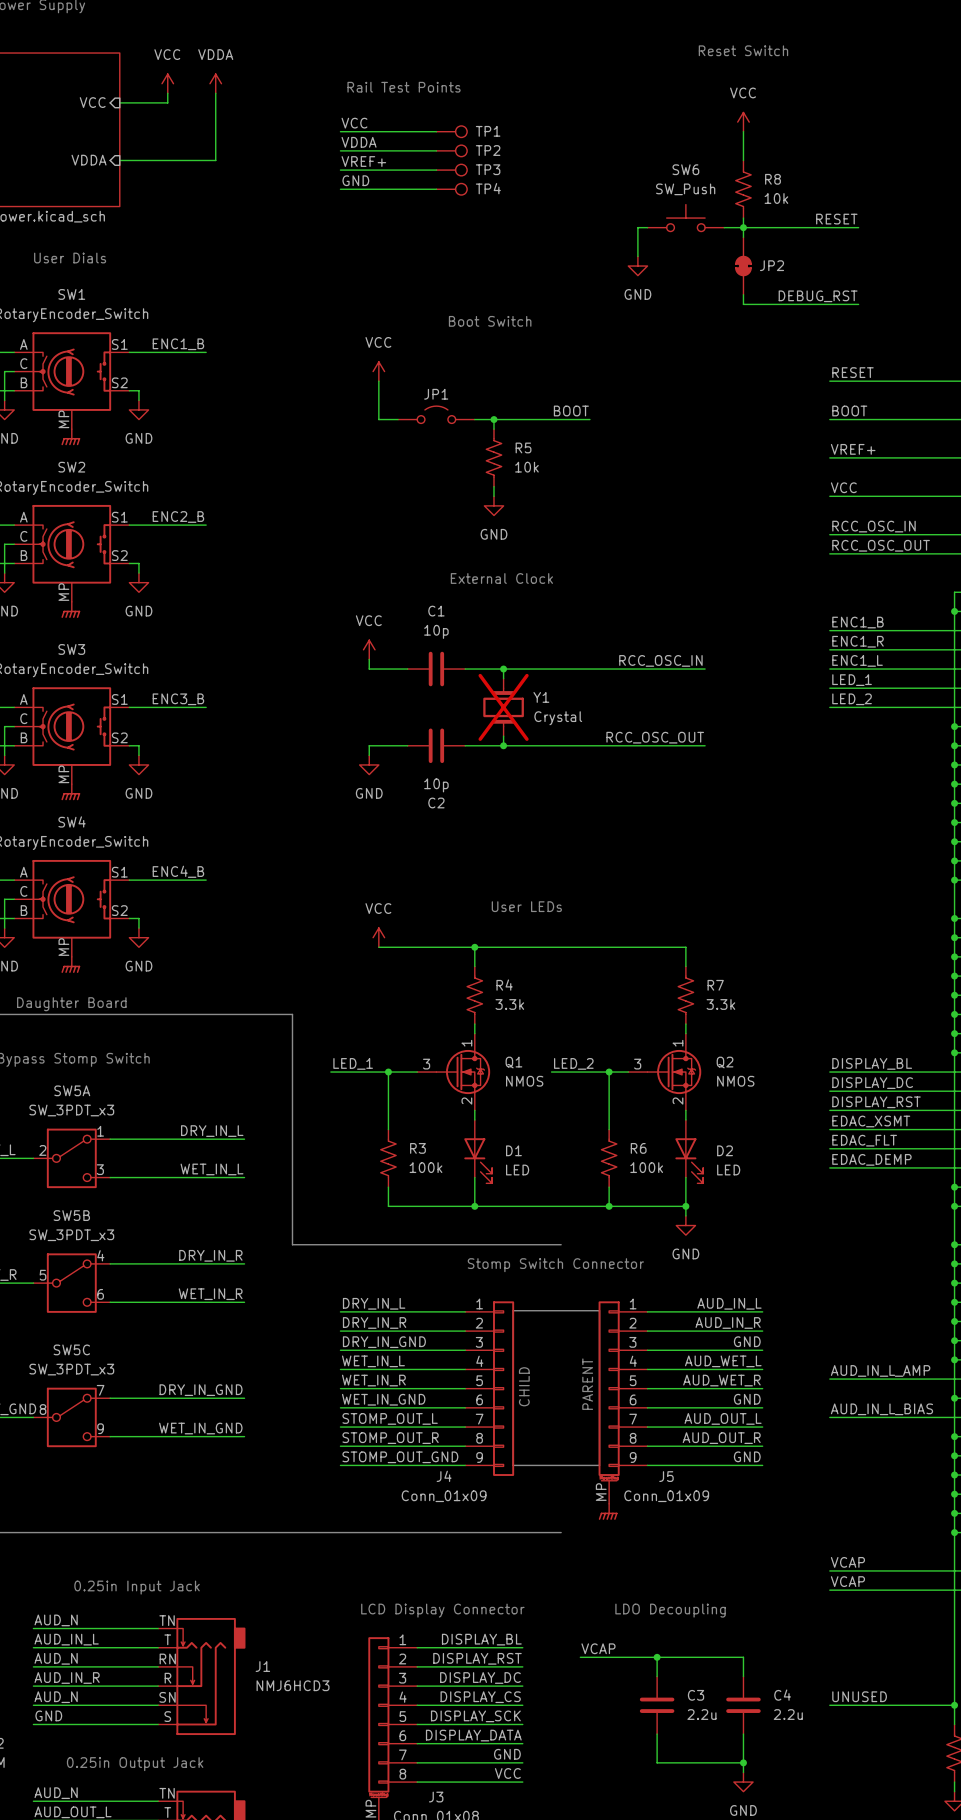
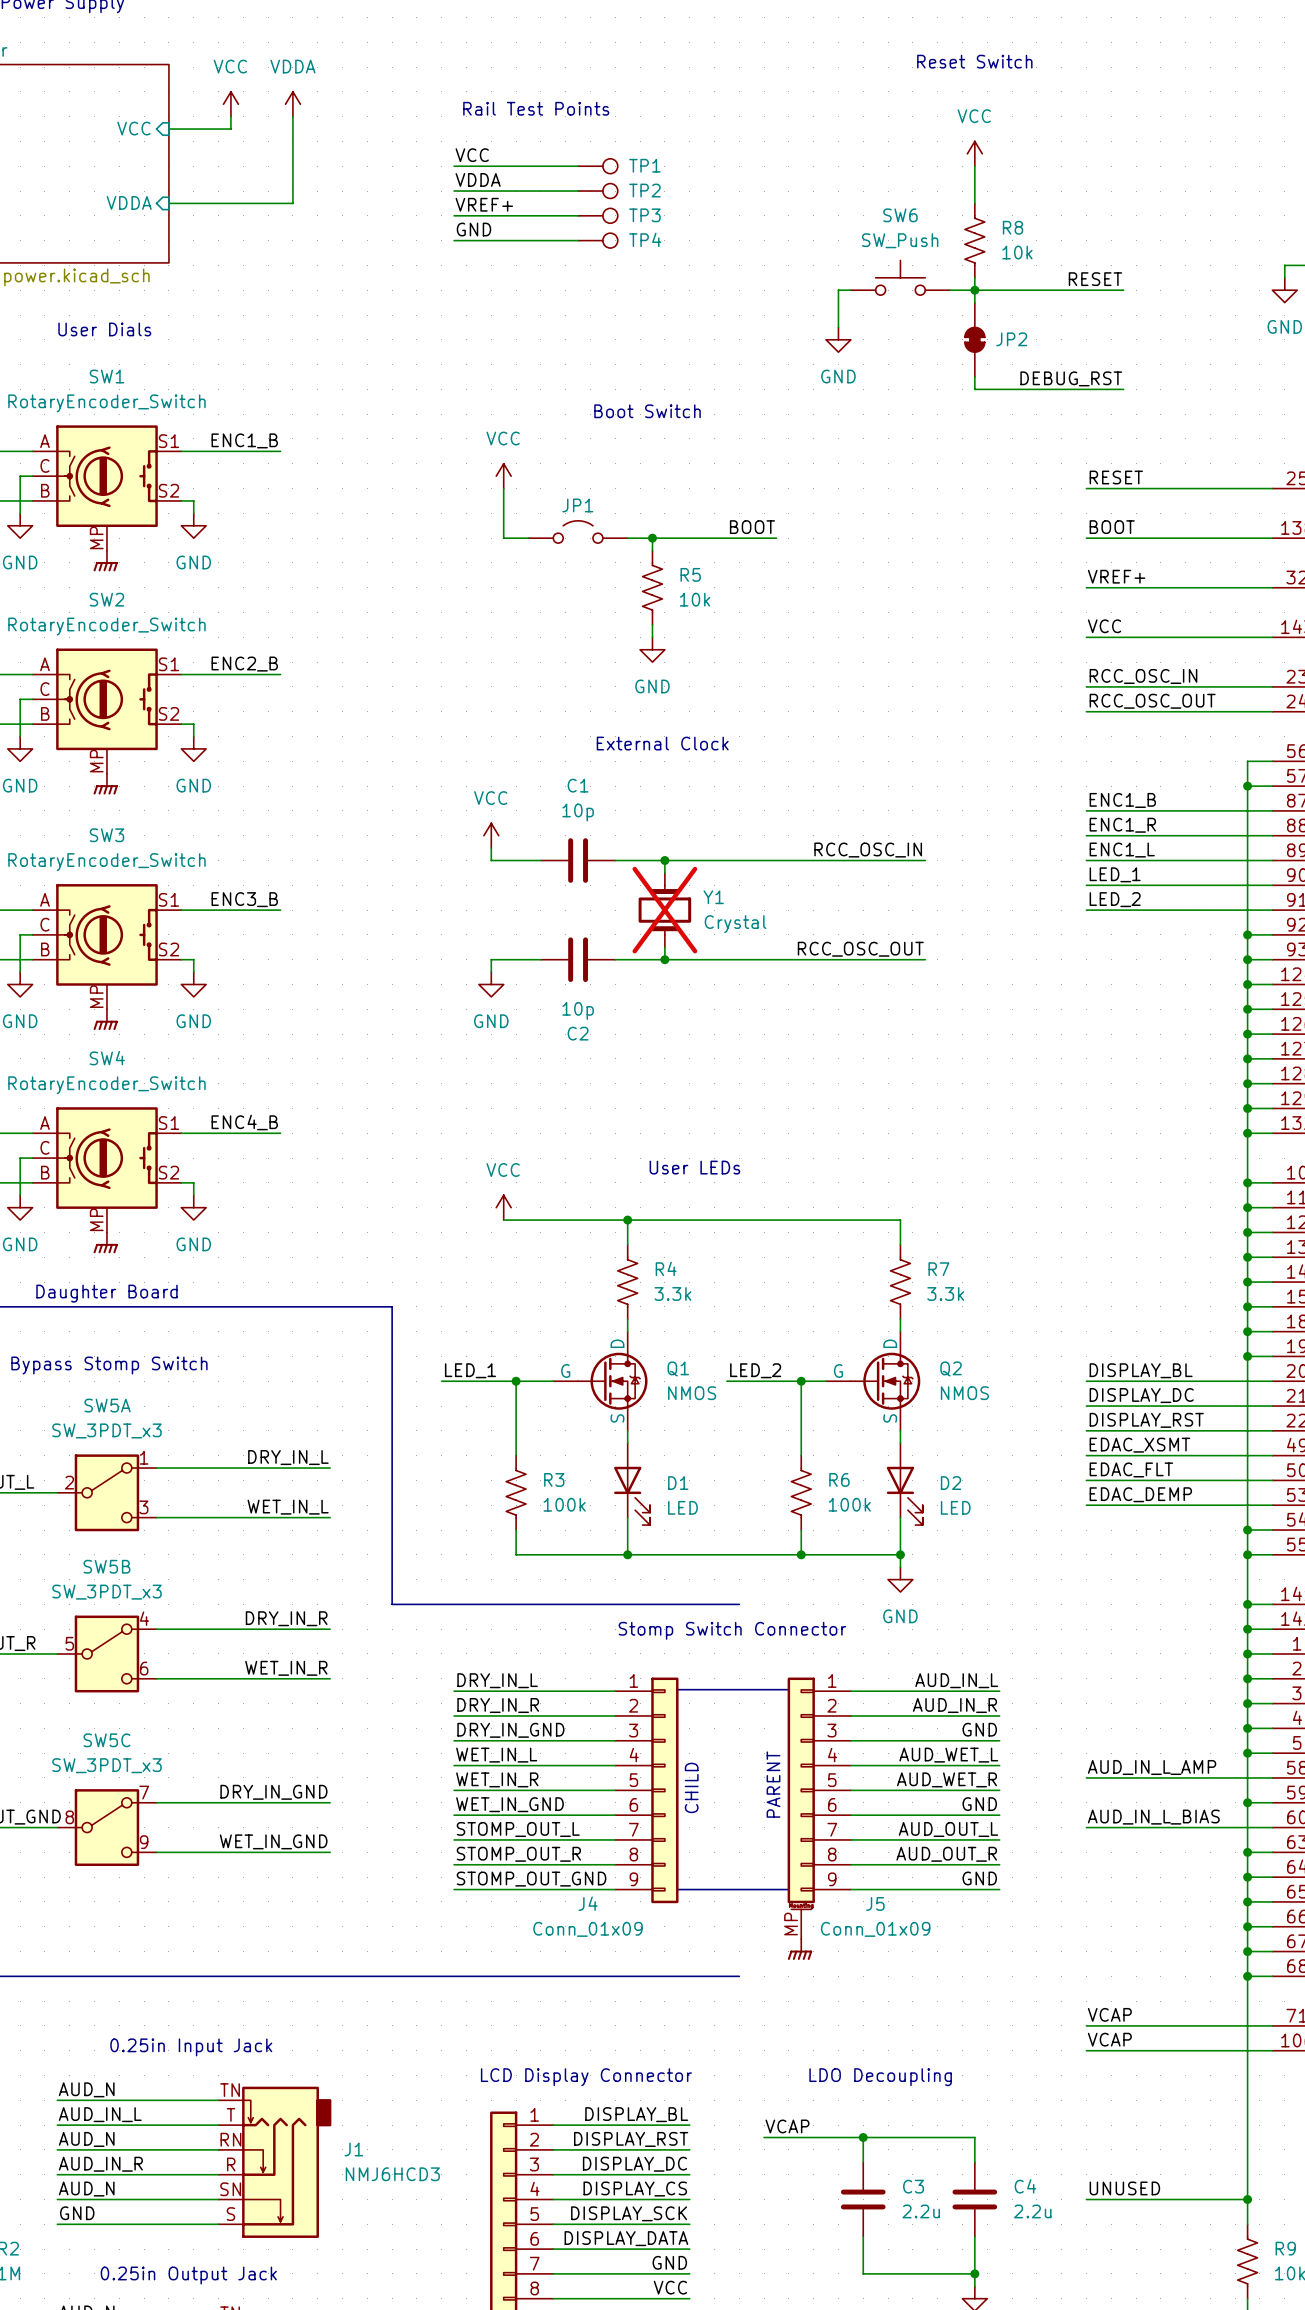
Q1 symbol: [417, 1033, 491, 1111] -> [553, 1331, 648, 1431]
Q2 symbol: [628, 1033, 702, 1111] -> [826, 1331, 921, 1431]

